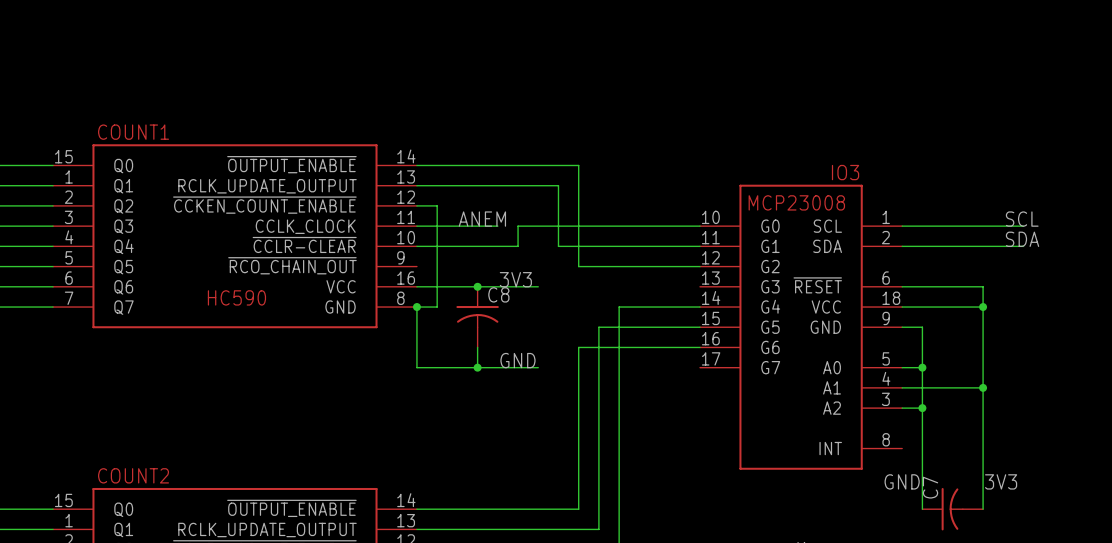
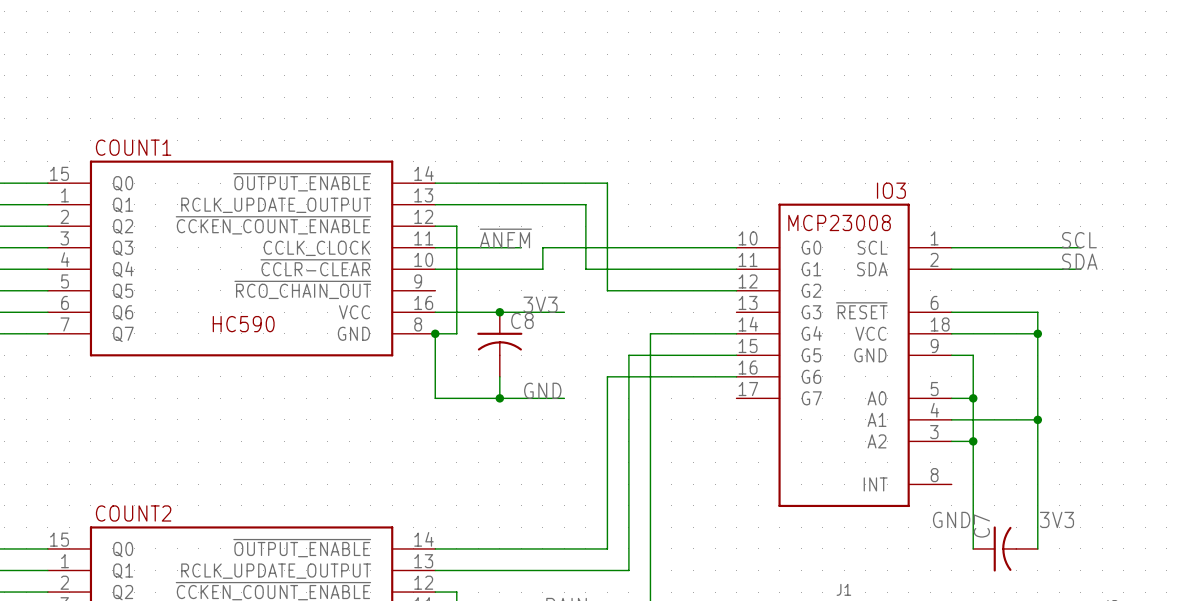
label: ANEM (482, 219) -> ~{ANEM} (505, 238)

